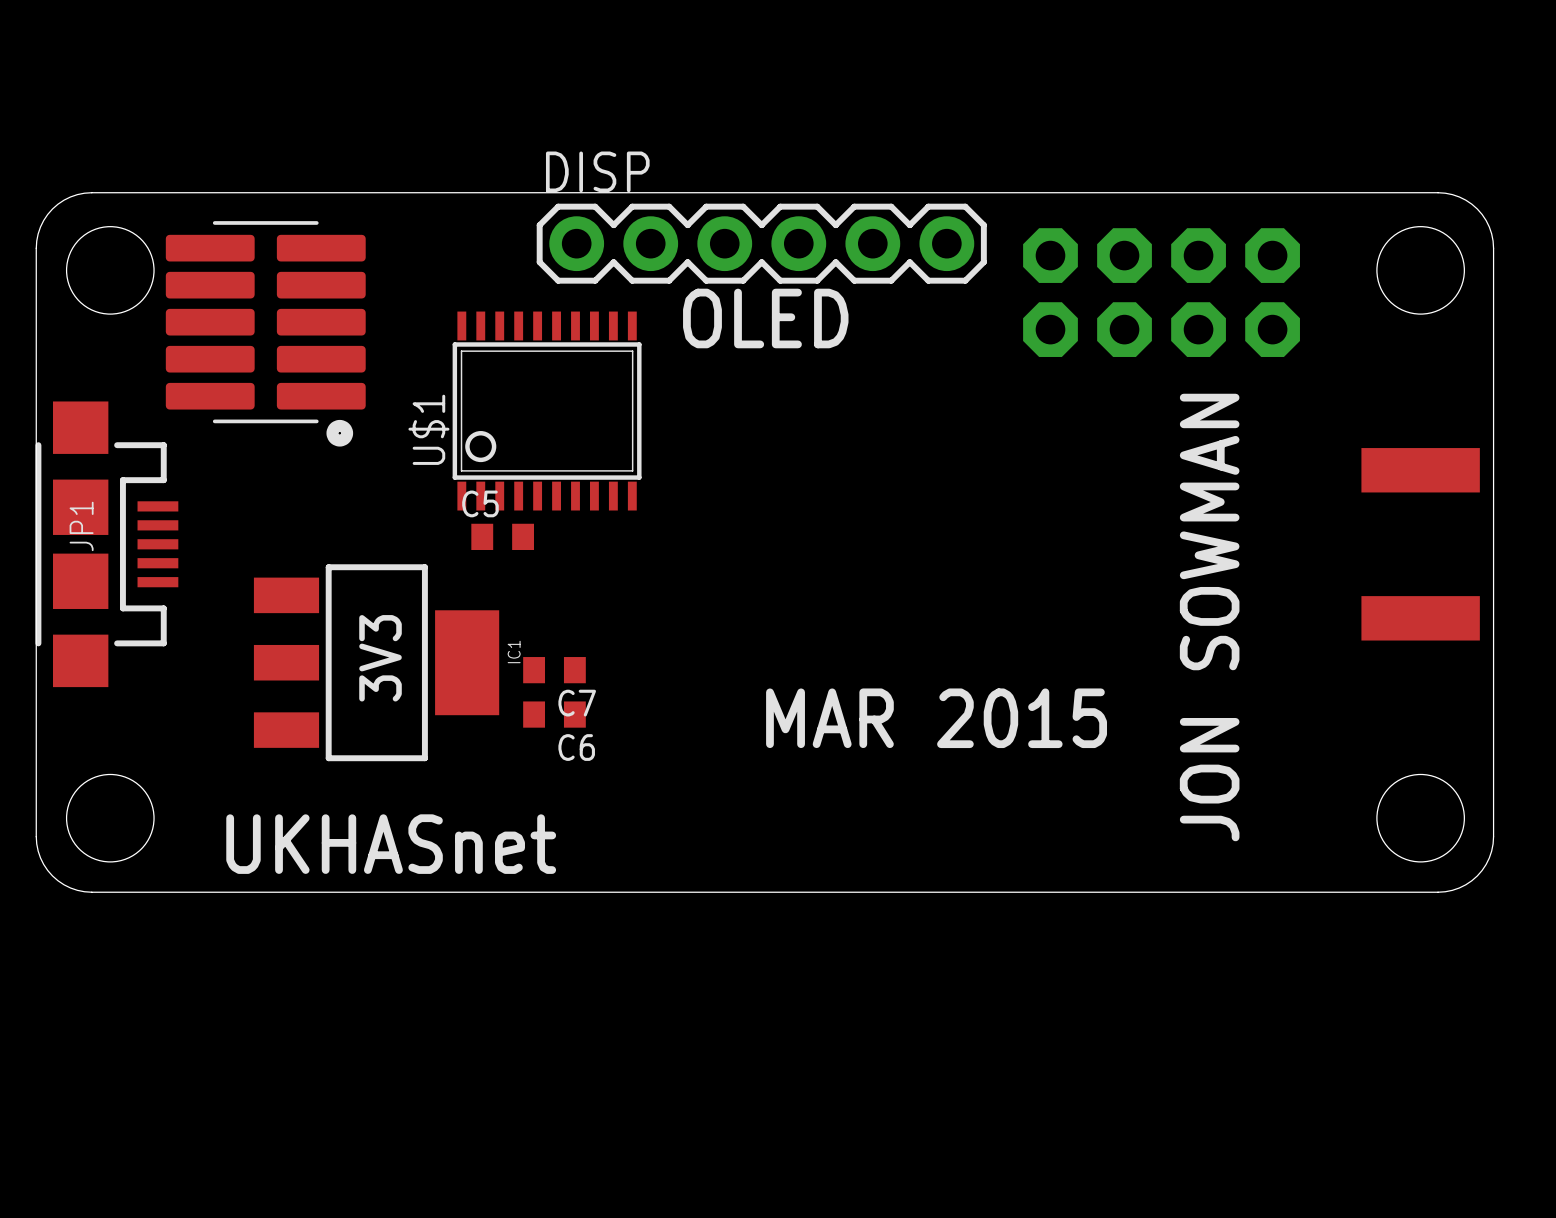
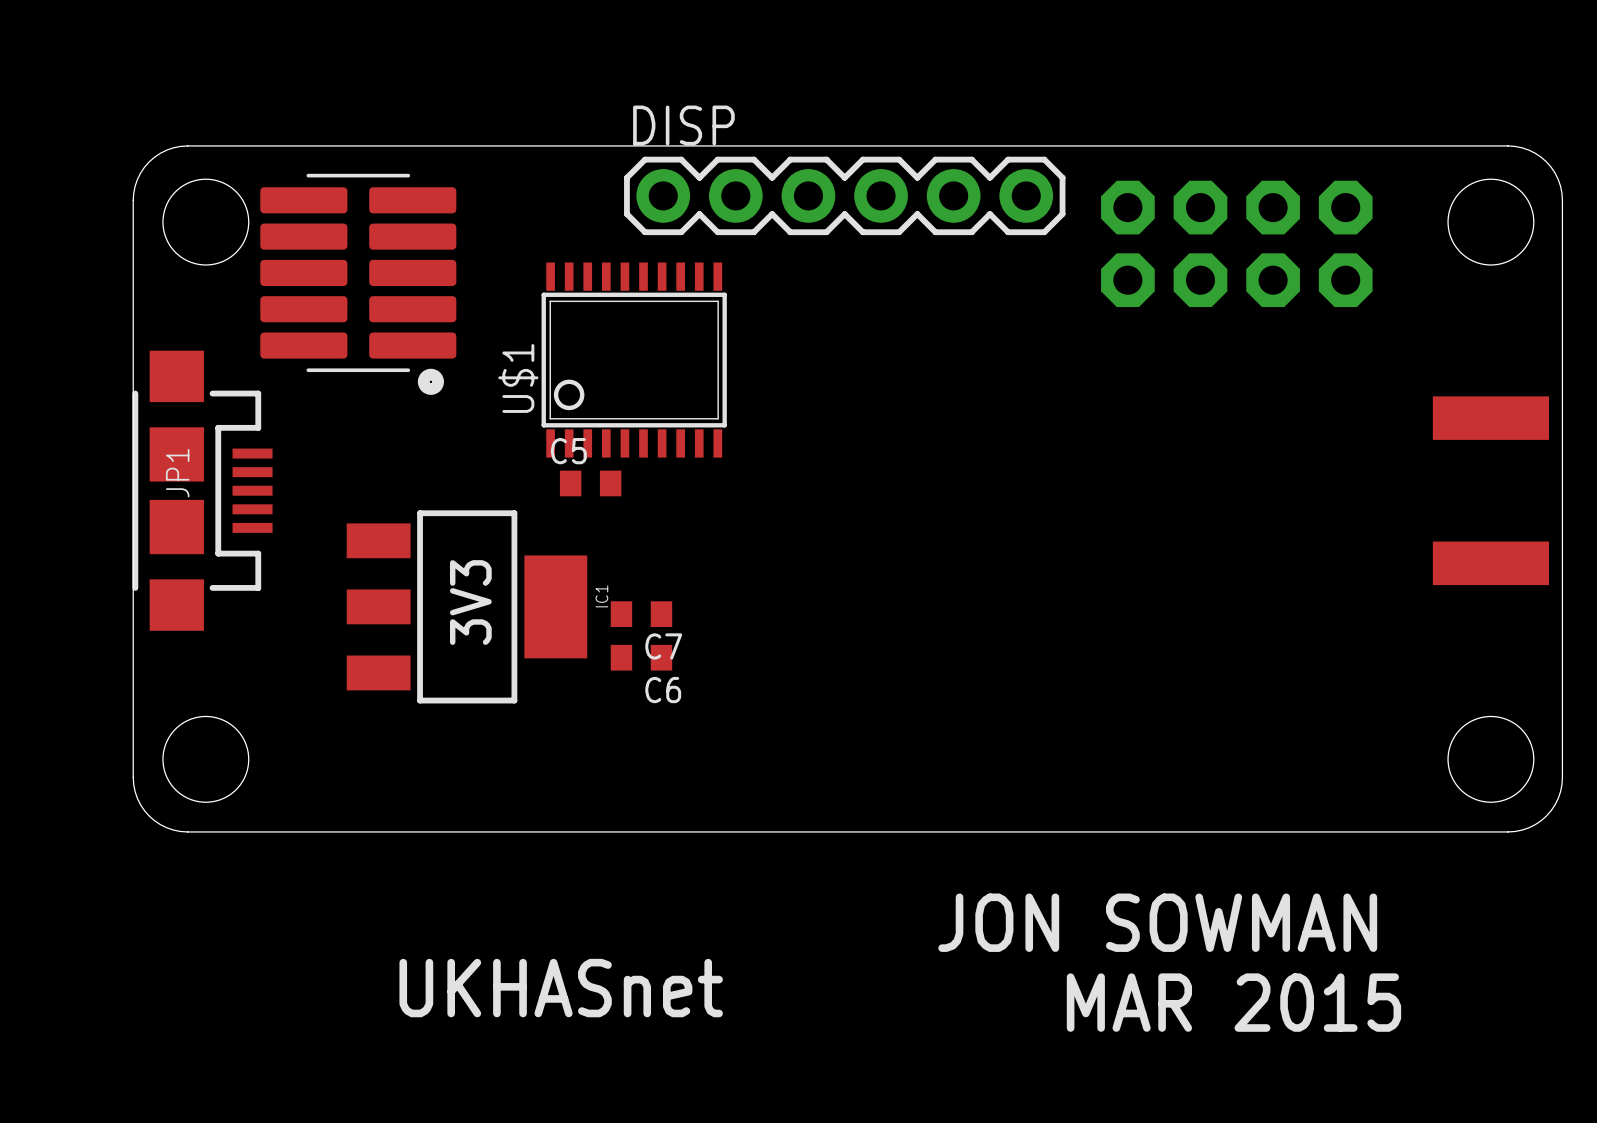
text: OLED (765, 318) -> none
text rotation: 0° (1209, 617) -> 90° clockwise (1157, 922)
text position: MAR 2015 (936, 718) -> MAR 2015 (1233, 1002)
text position: UKHASnet (391, 844) -> UKHASnet (561, 988)

